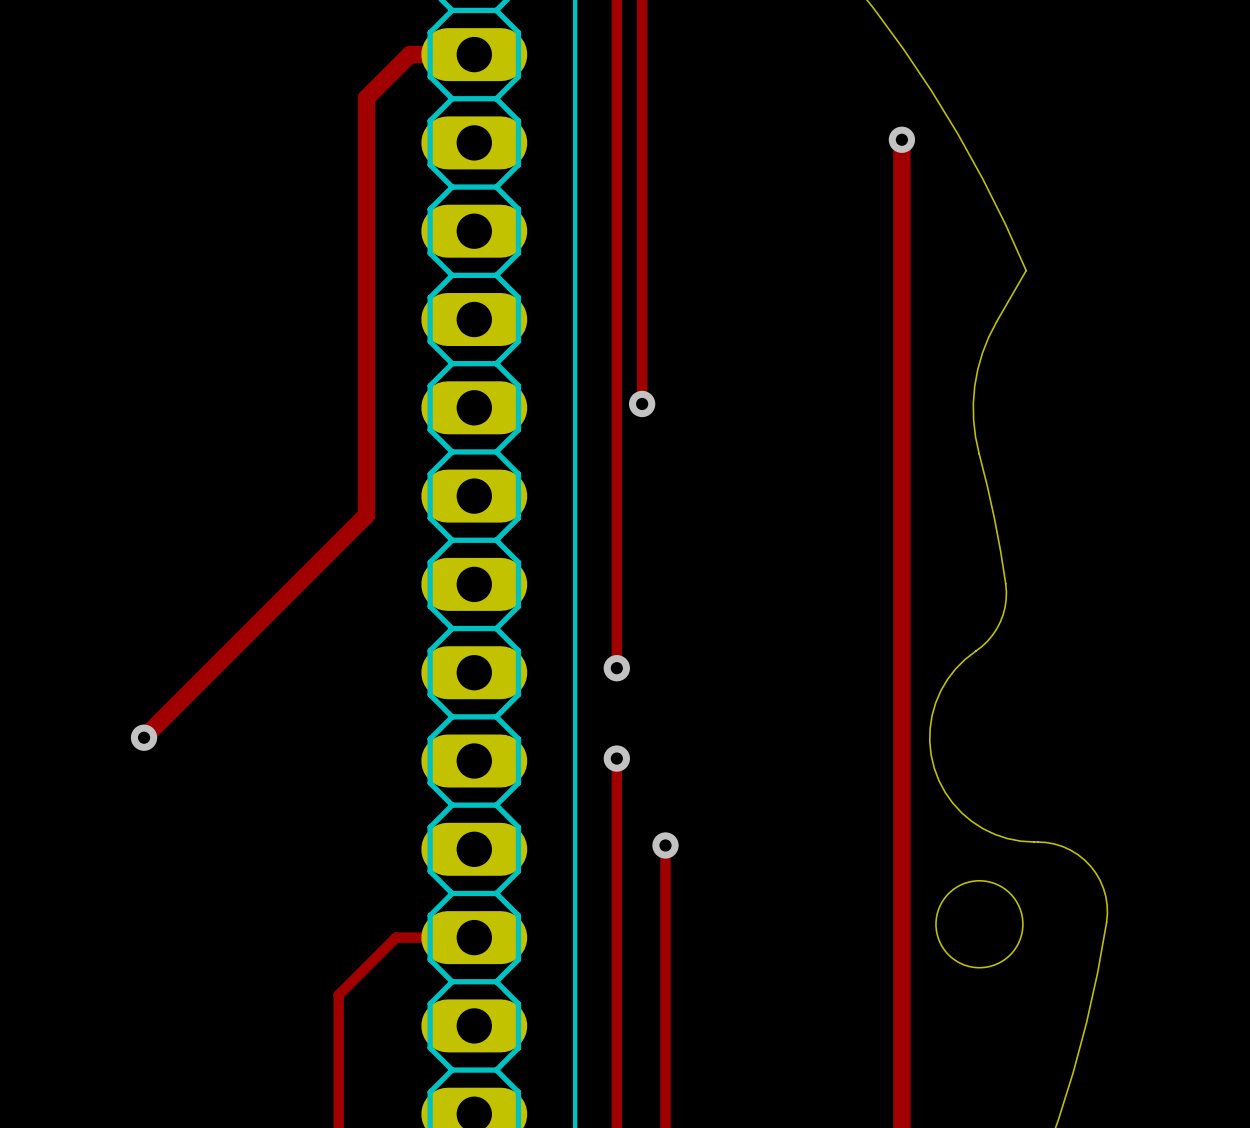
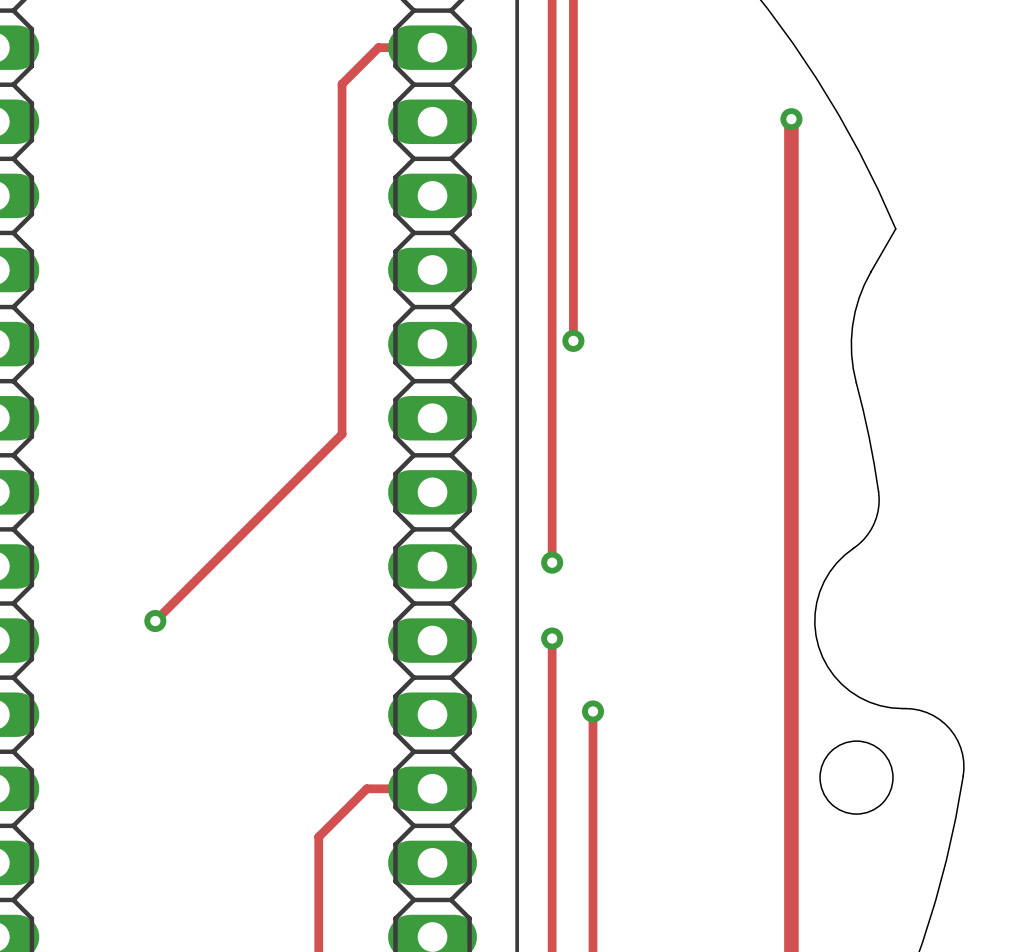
track width: thick (474, 54) (409, 54) (366, 98) (366, 515) (144, 737) -> thin (432, 47) (378, 47) (342, 84) (342, 434) (155, 621)

